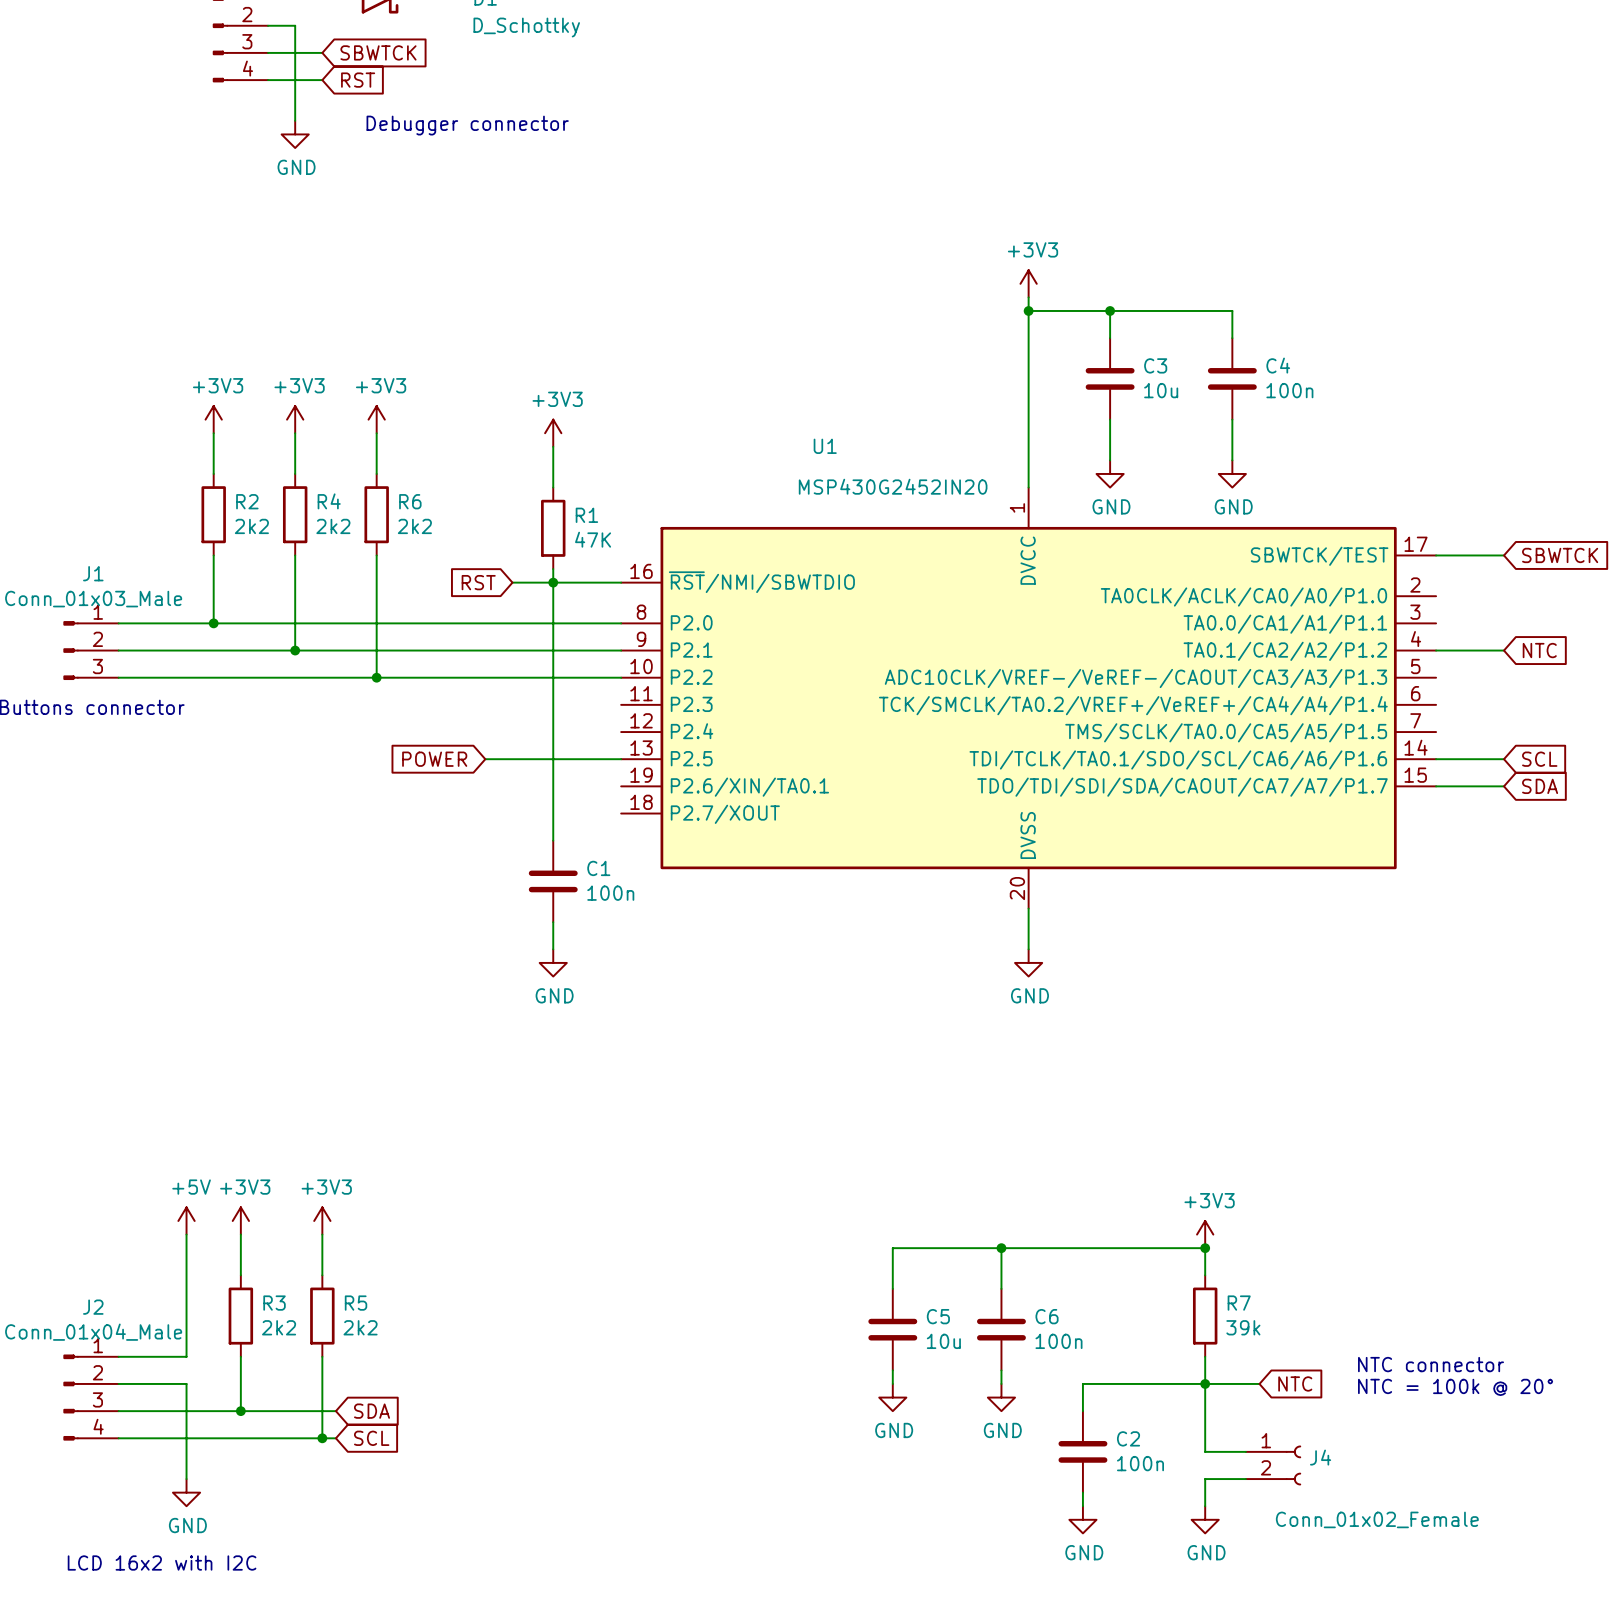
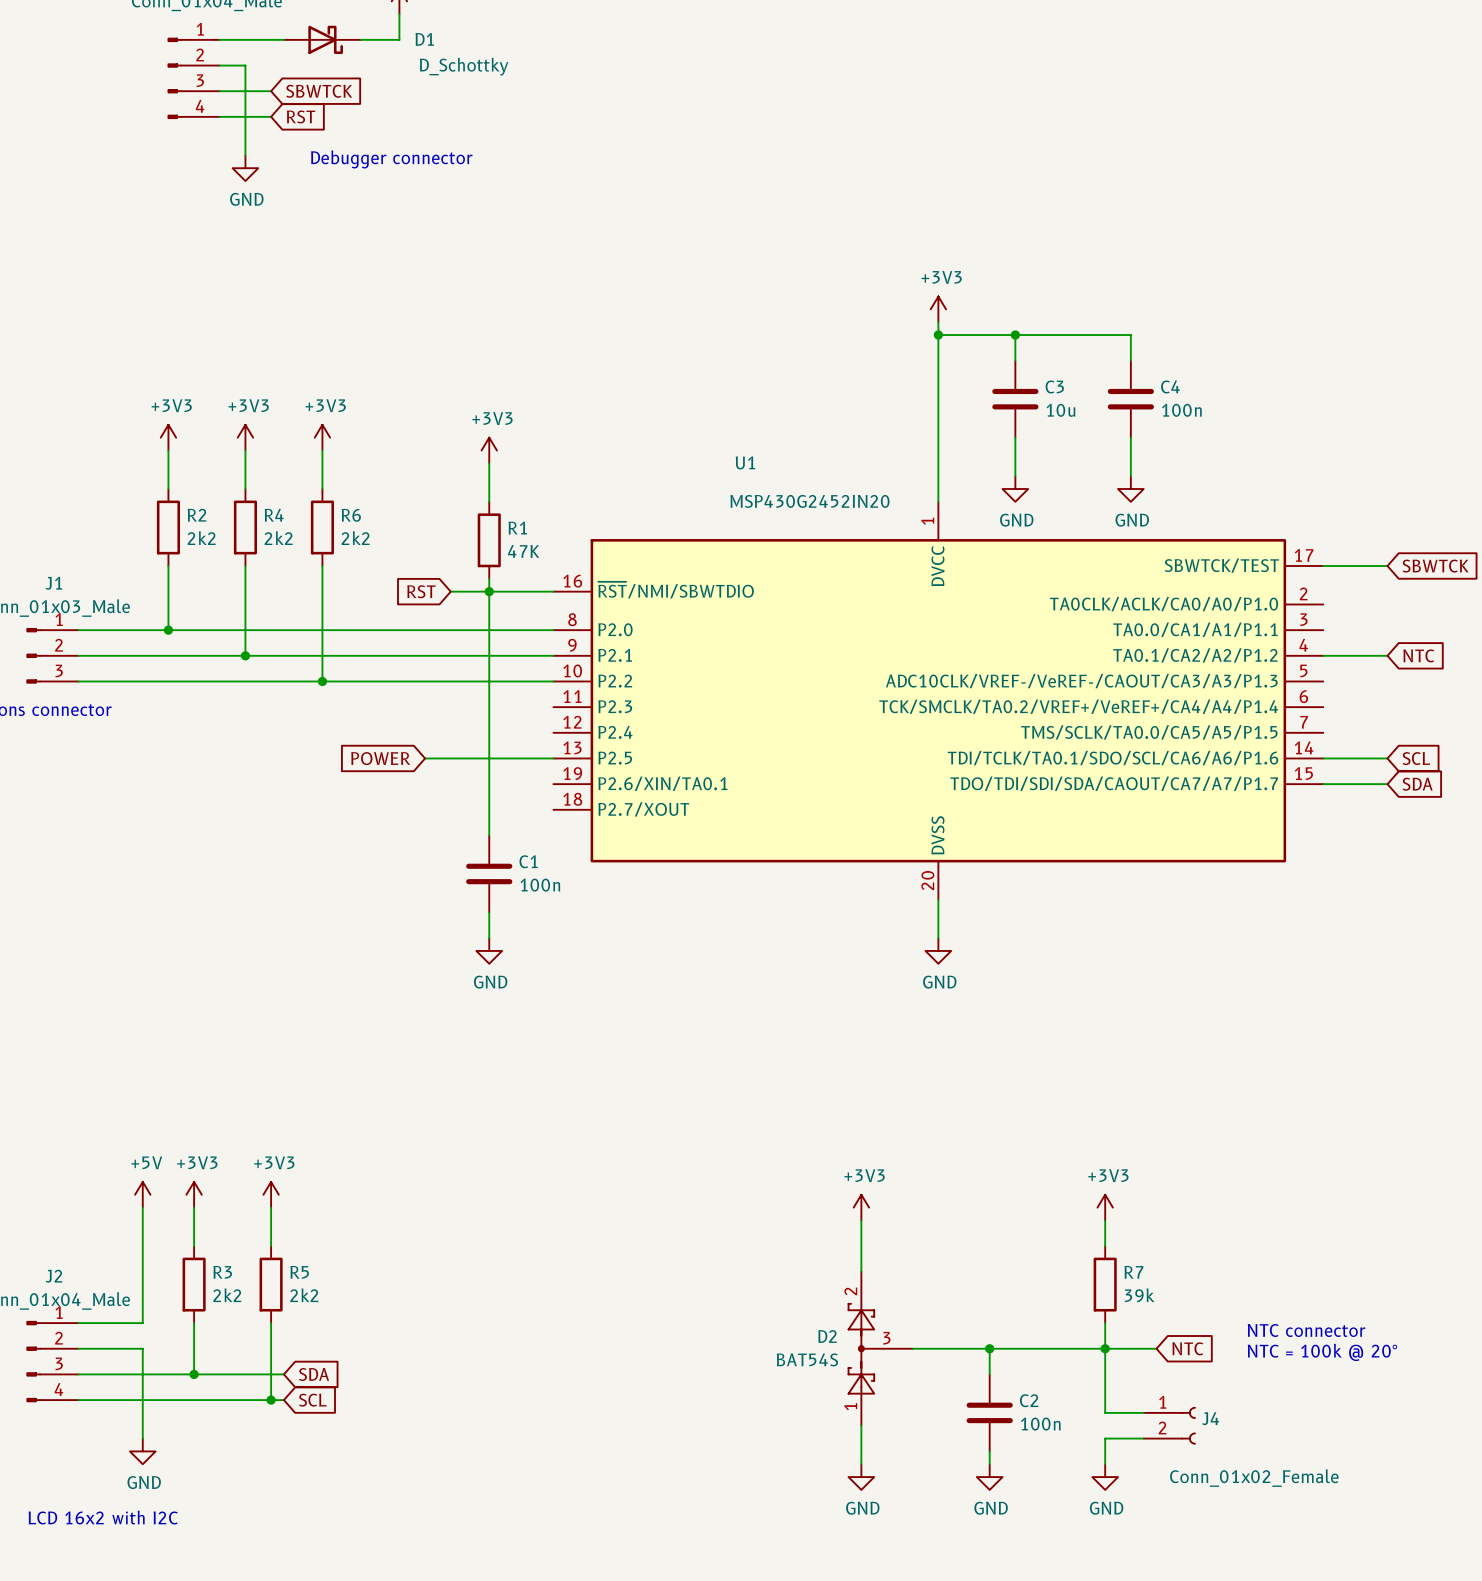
power symbol: none -> +3V3 (861, 1207)
wire: none -> (861, 1220) (861, 1271)
wire: (1001, 1248) (1001, 1288) -> (861, 1425) (861, 1464)
junction: (1001, 1248) -> none
wire: (1205, 1248) (892, 1248) (892, 1288) -> none
junction: (1205, 1248) -> none
C5: 10u (892, 1329) -> none
C6: 100n (1001, 1329) -> none
wire: (892, 1370) (892, 1383) -> none
wire: (1001, 1370) (1001, 1383) -> (989, 1348) (912, 1348)
D2: none -> BAT54S (880, 1348)
junction: none -> (989, 1348)
power symbol: GND (892, 1397) -> none
power symbol: GND (1001, 1397) -> none
power symbol: none -> GND (861, 1477)

